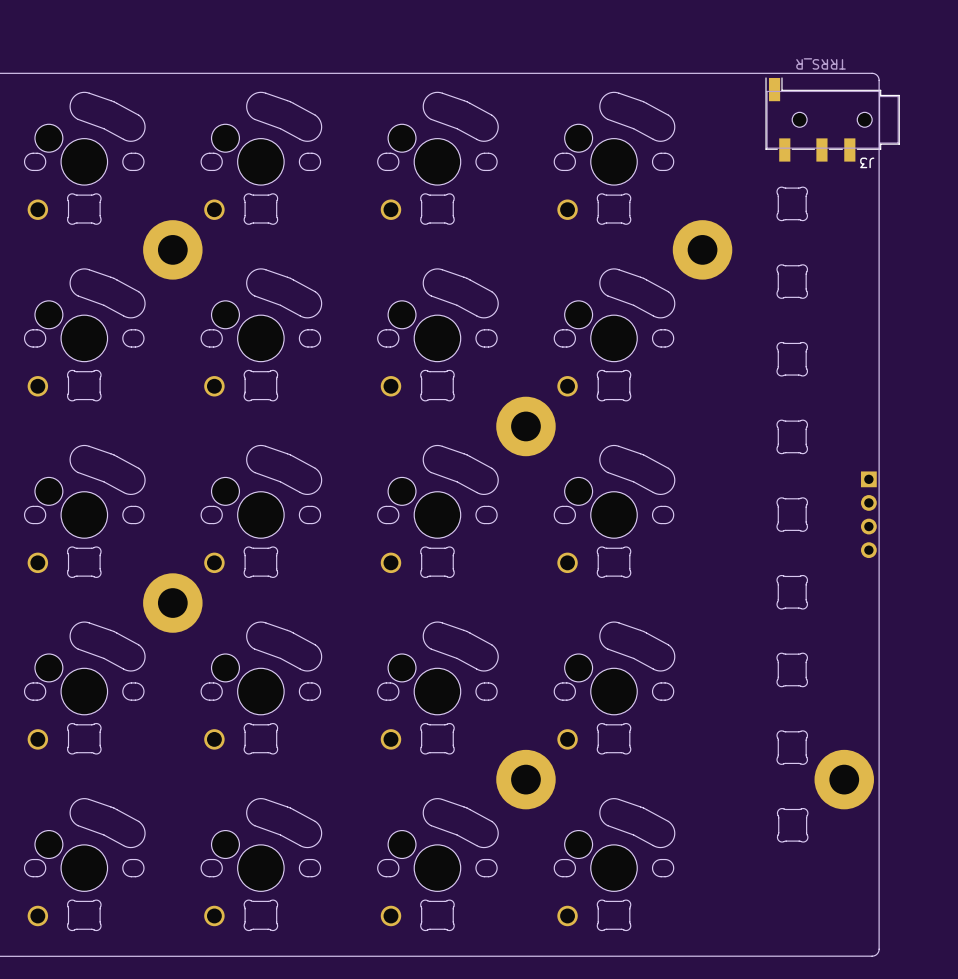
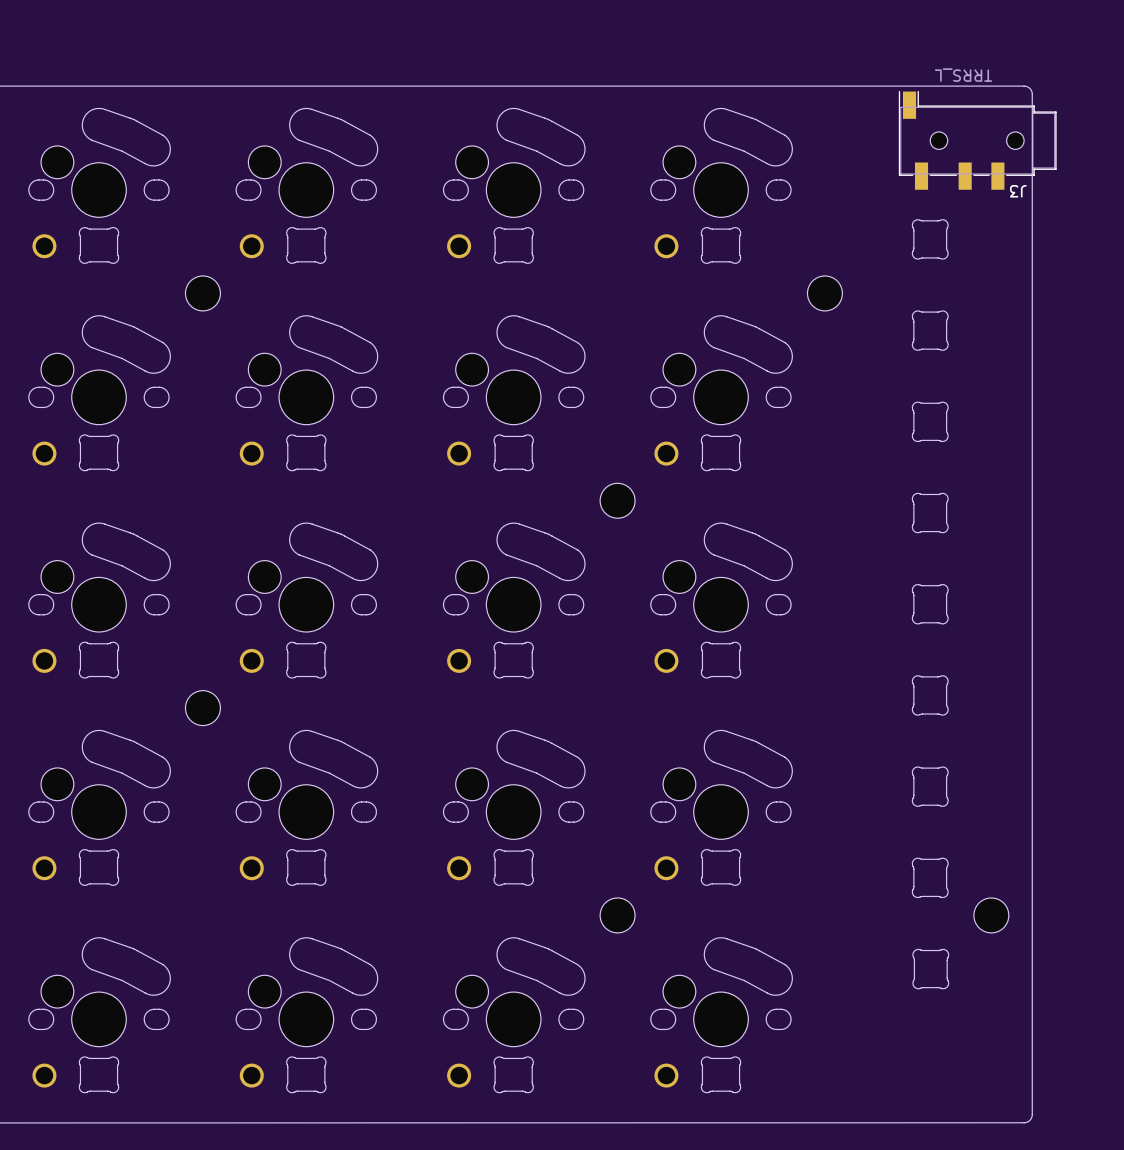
J3 value: TRRS_R (821, 63) -> TRRS_L (963, 75)
part footprint: [143, 220, 203, 280] -> [185, 275, 221, 311]
part footprint: [672, 220, 733, 280] -> [807, 275, 843, 311]
part footprint: [496, 396, 556, 457] -> [600, 483, 636, 519]
part: (868, 514) -> none
part footprint: [143, 573, 203, 633] -> [185, 690, 221, 726]
part footprint: [496, 749, 556, 810] -> [600, 897, 636, 933]
part footprint: [814, 749, 874, 810] -> [973, 897, 1009, 933]

